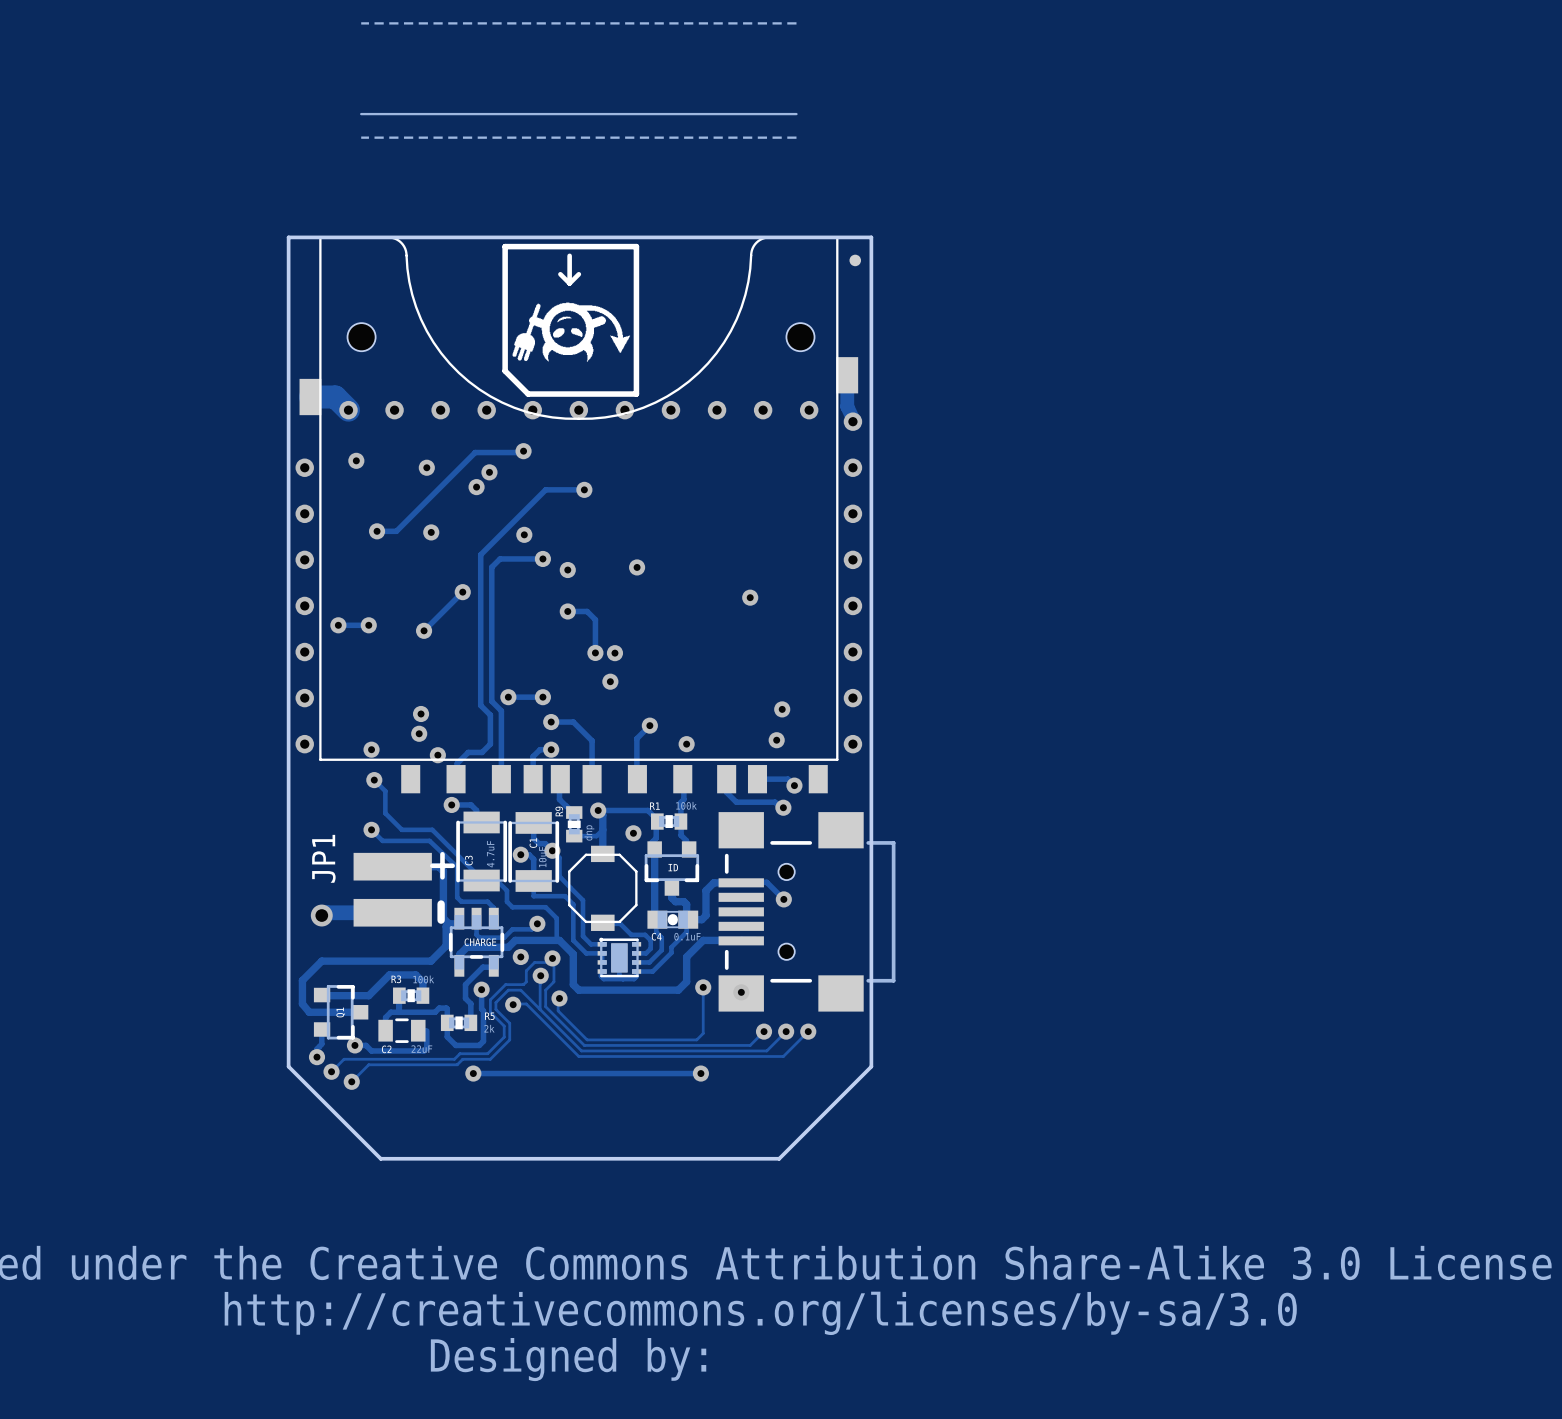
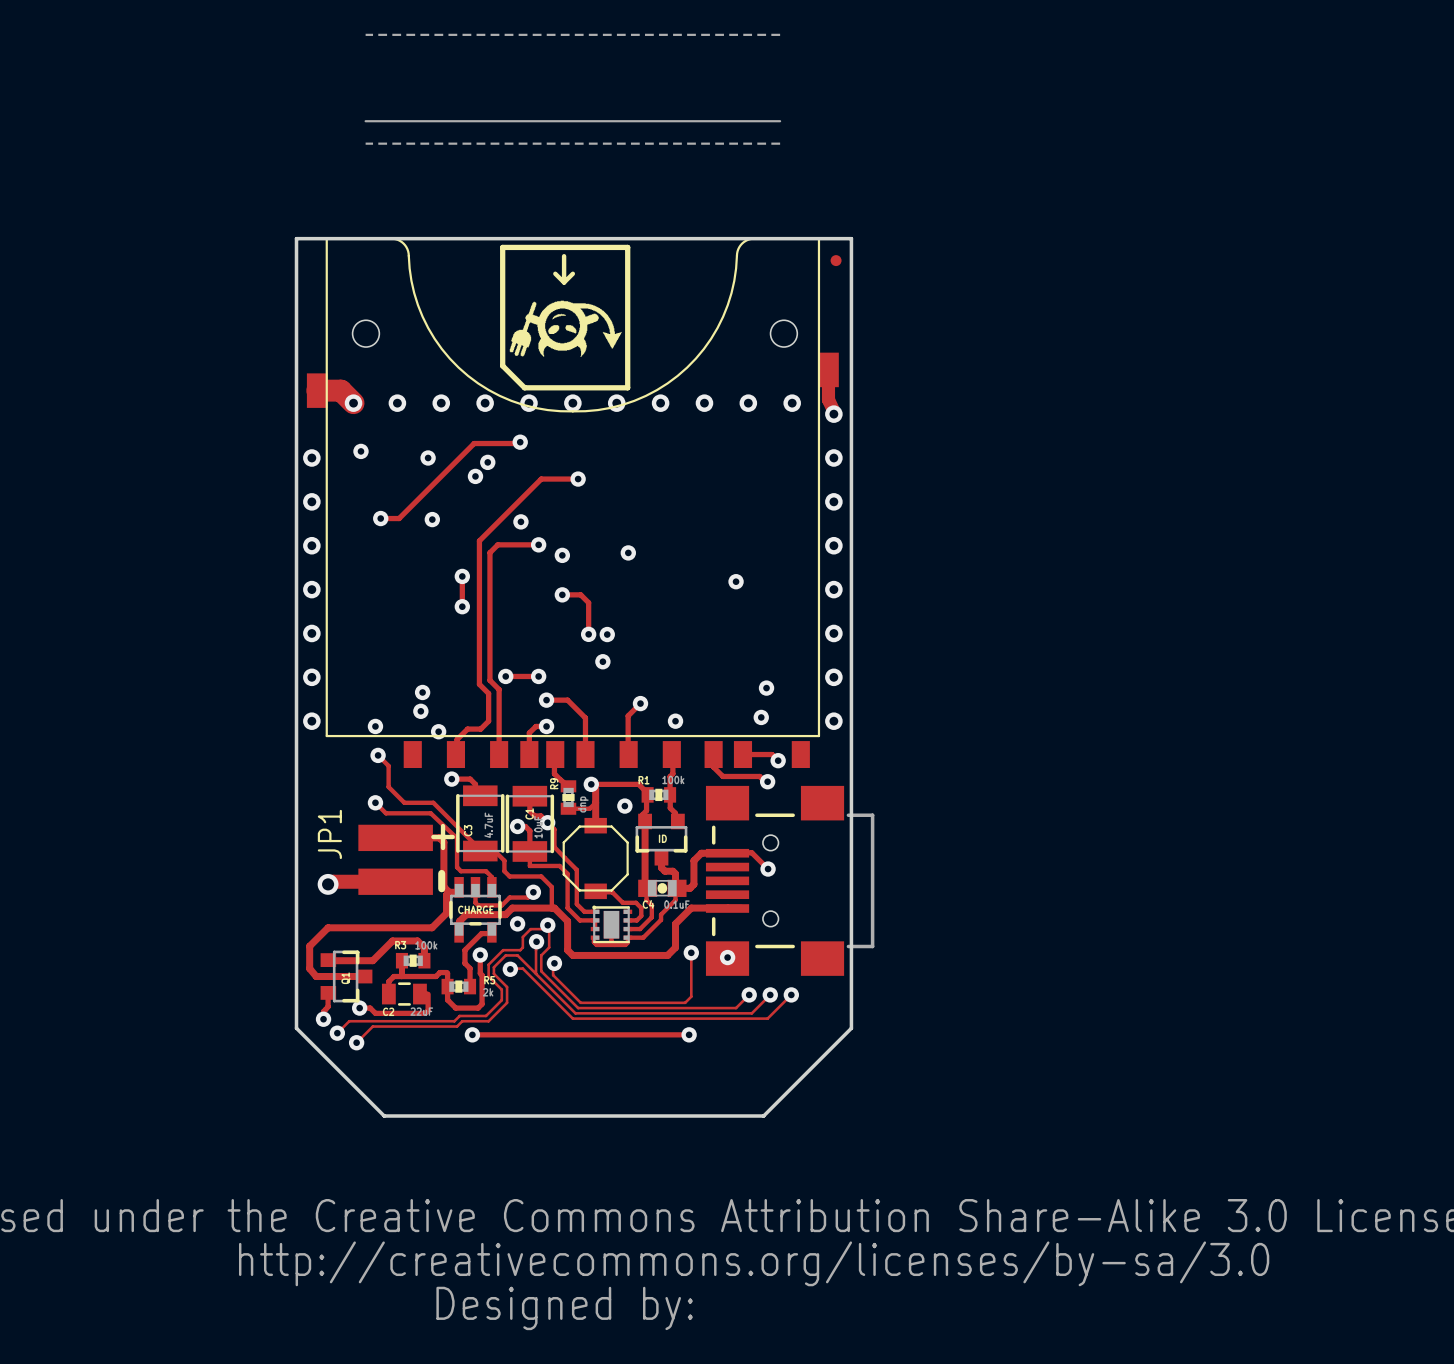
track: (462, 592) (424, 630) -> (462, 576) (462, 606)
track: (338, 625) (368, 625) -> none
via: (338, 625) -> none
via: (368, 625) -> none
via position: (424, 630) -> (462, 606)

